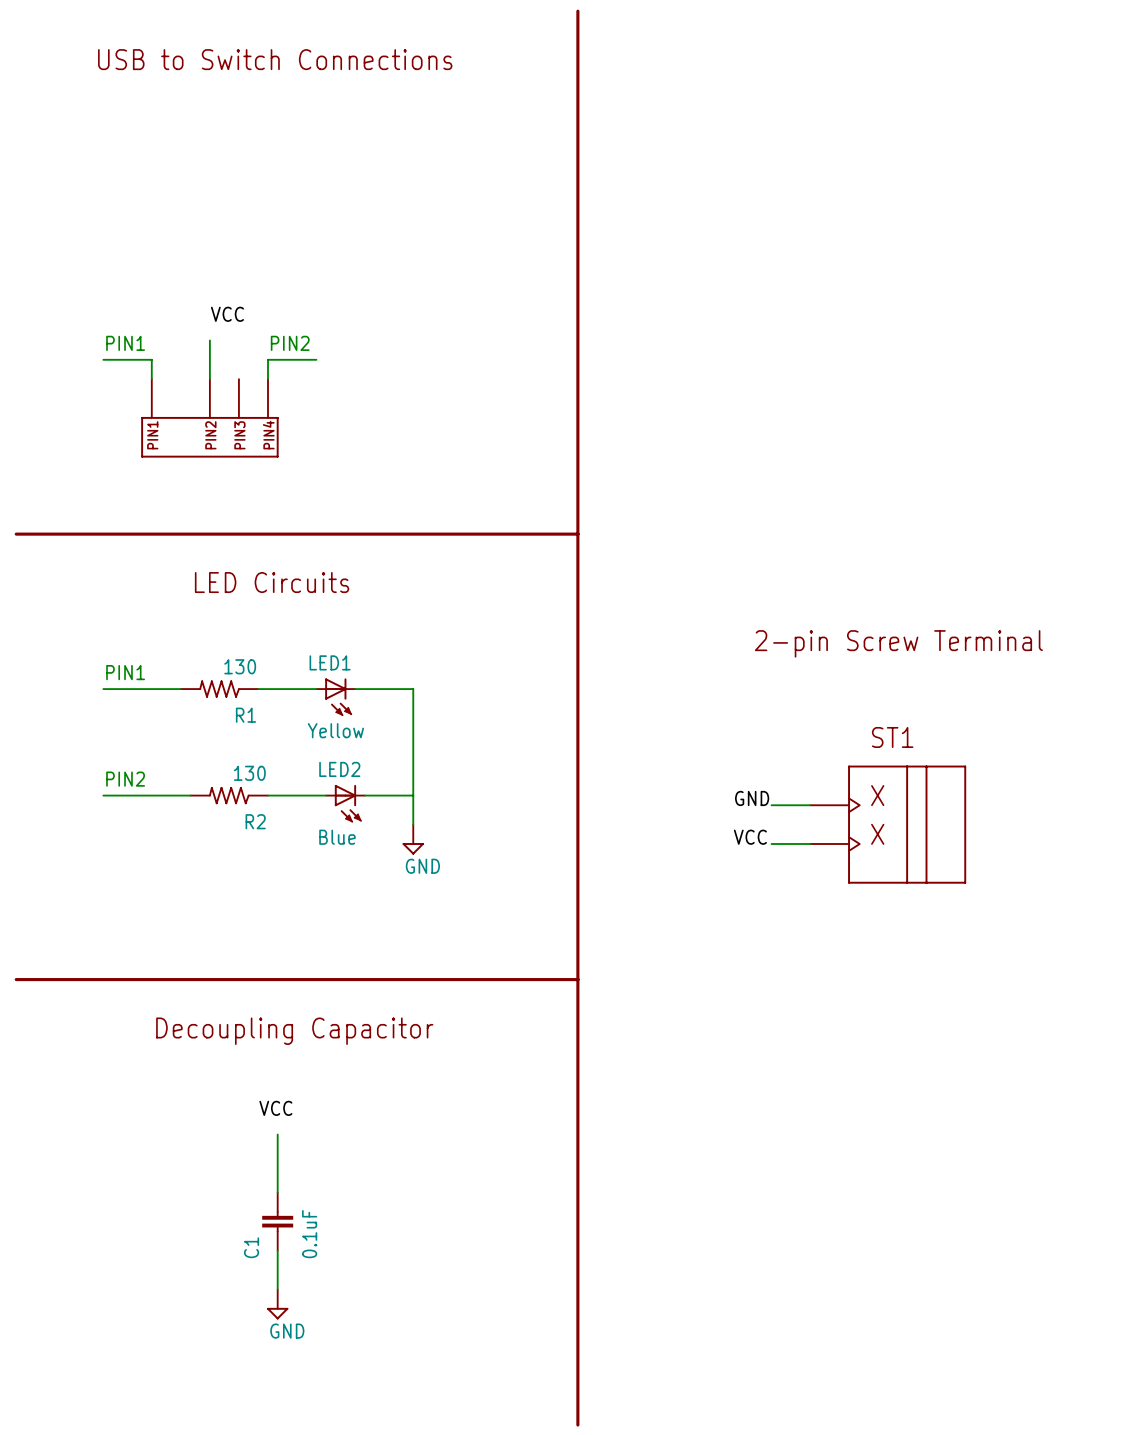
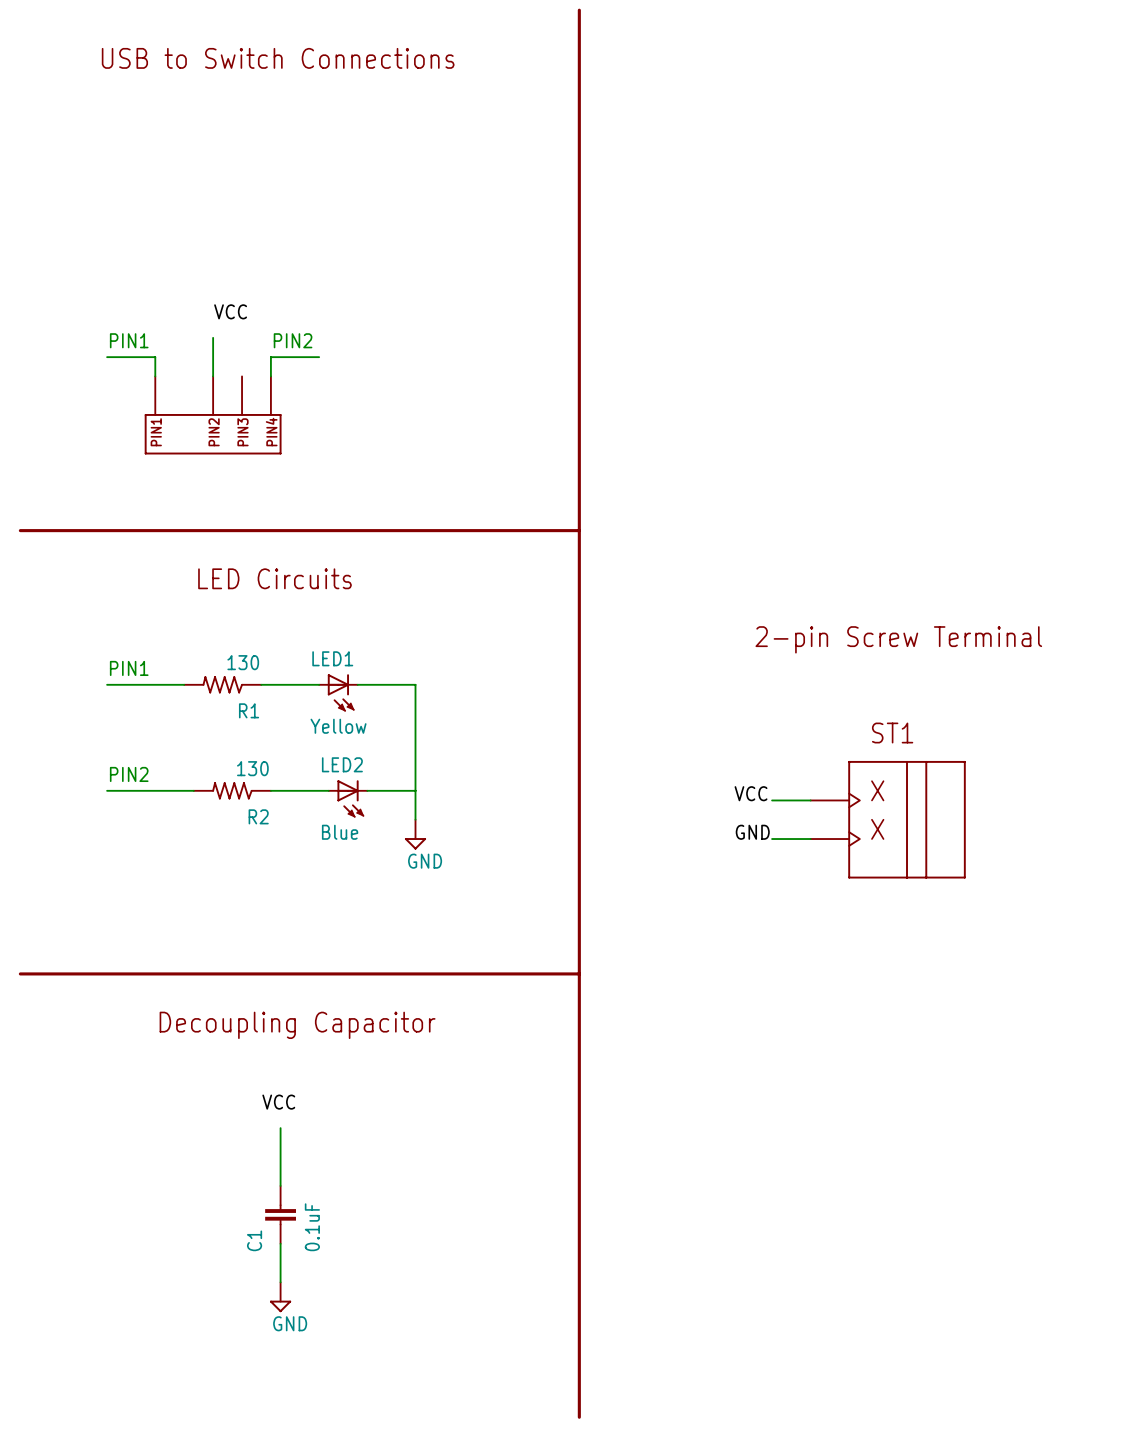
label: GND (752, 798) -> VCC (751, 793)
label: VCC (750, 837) -> GND (752, 832)

